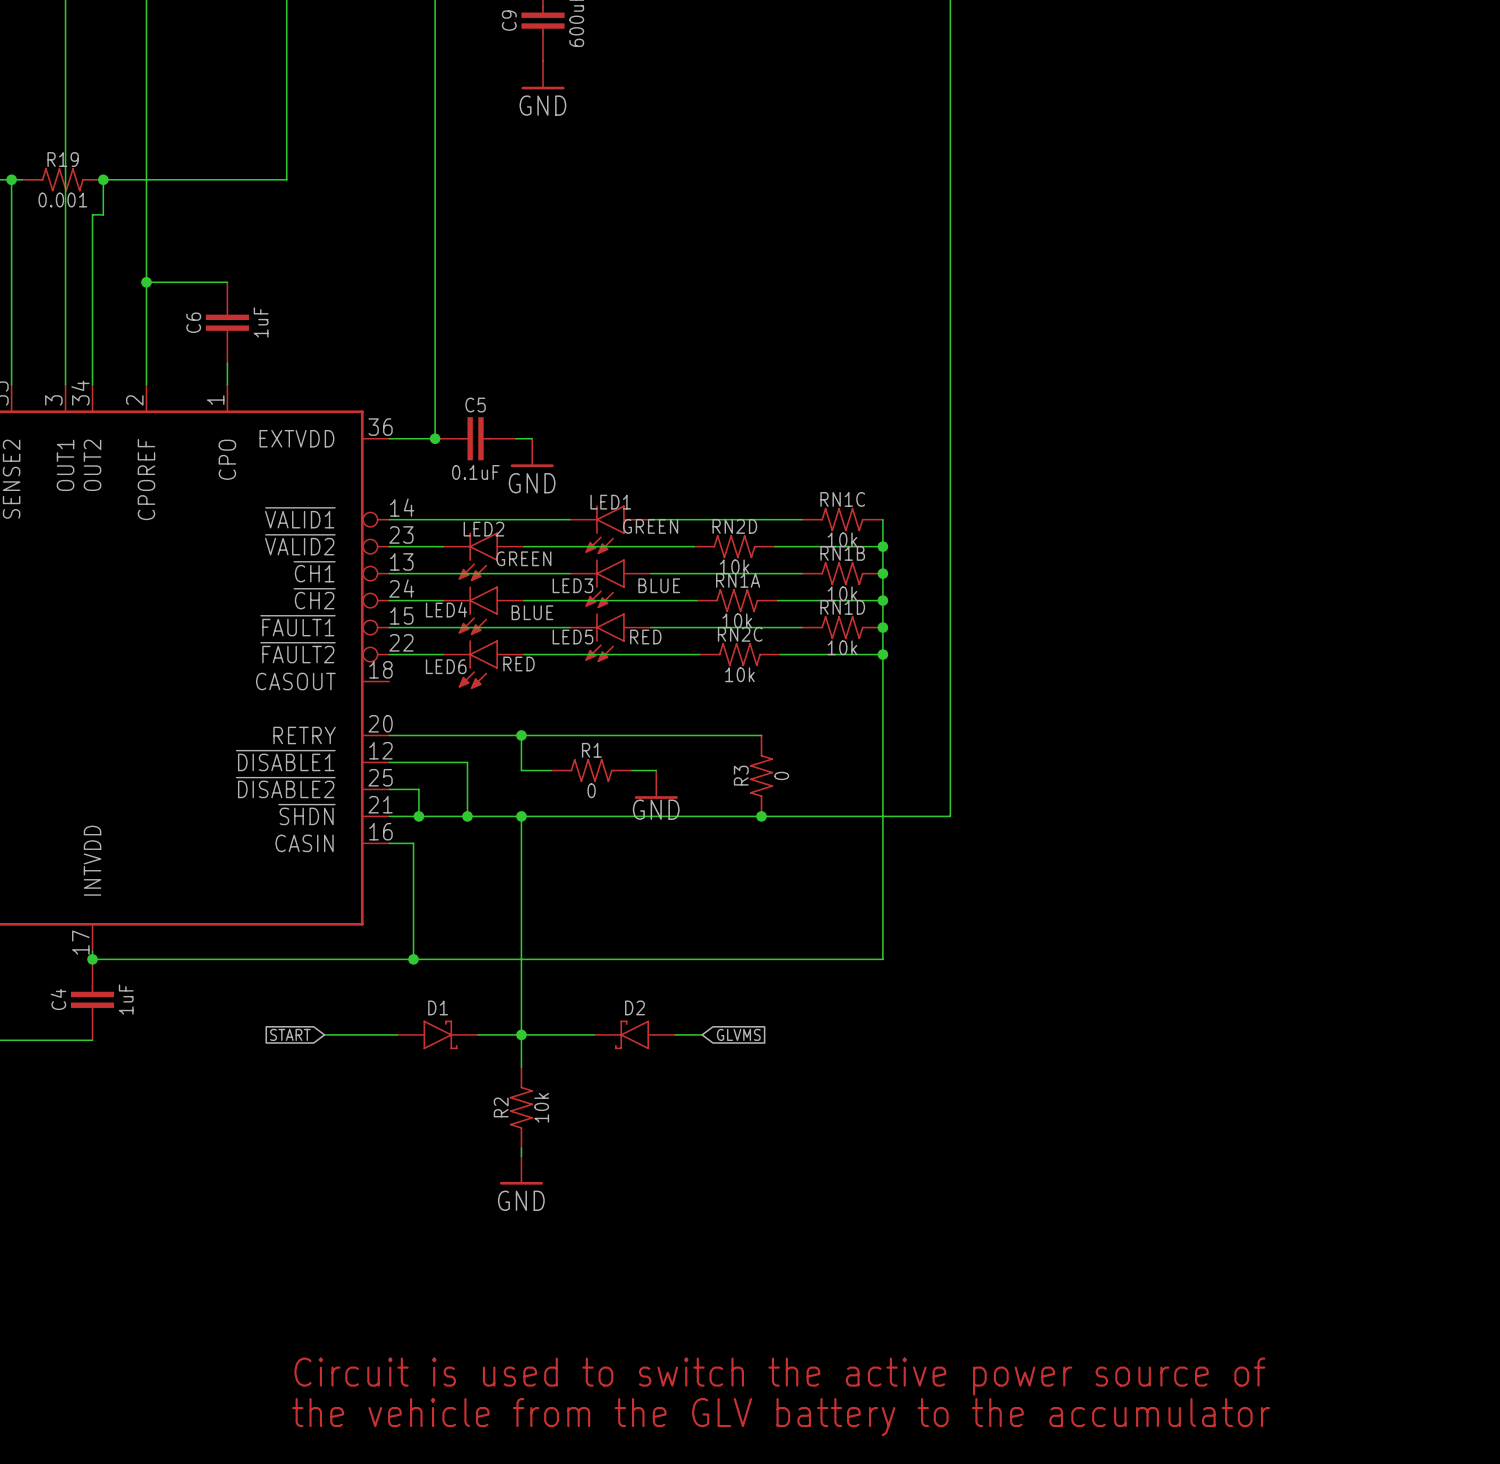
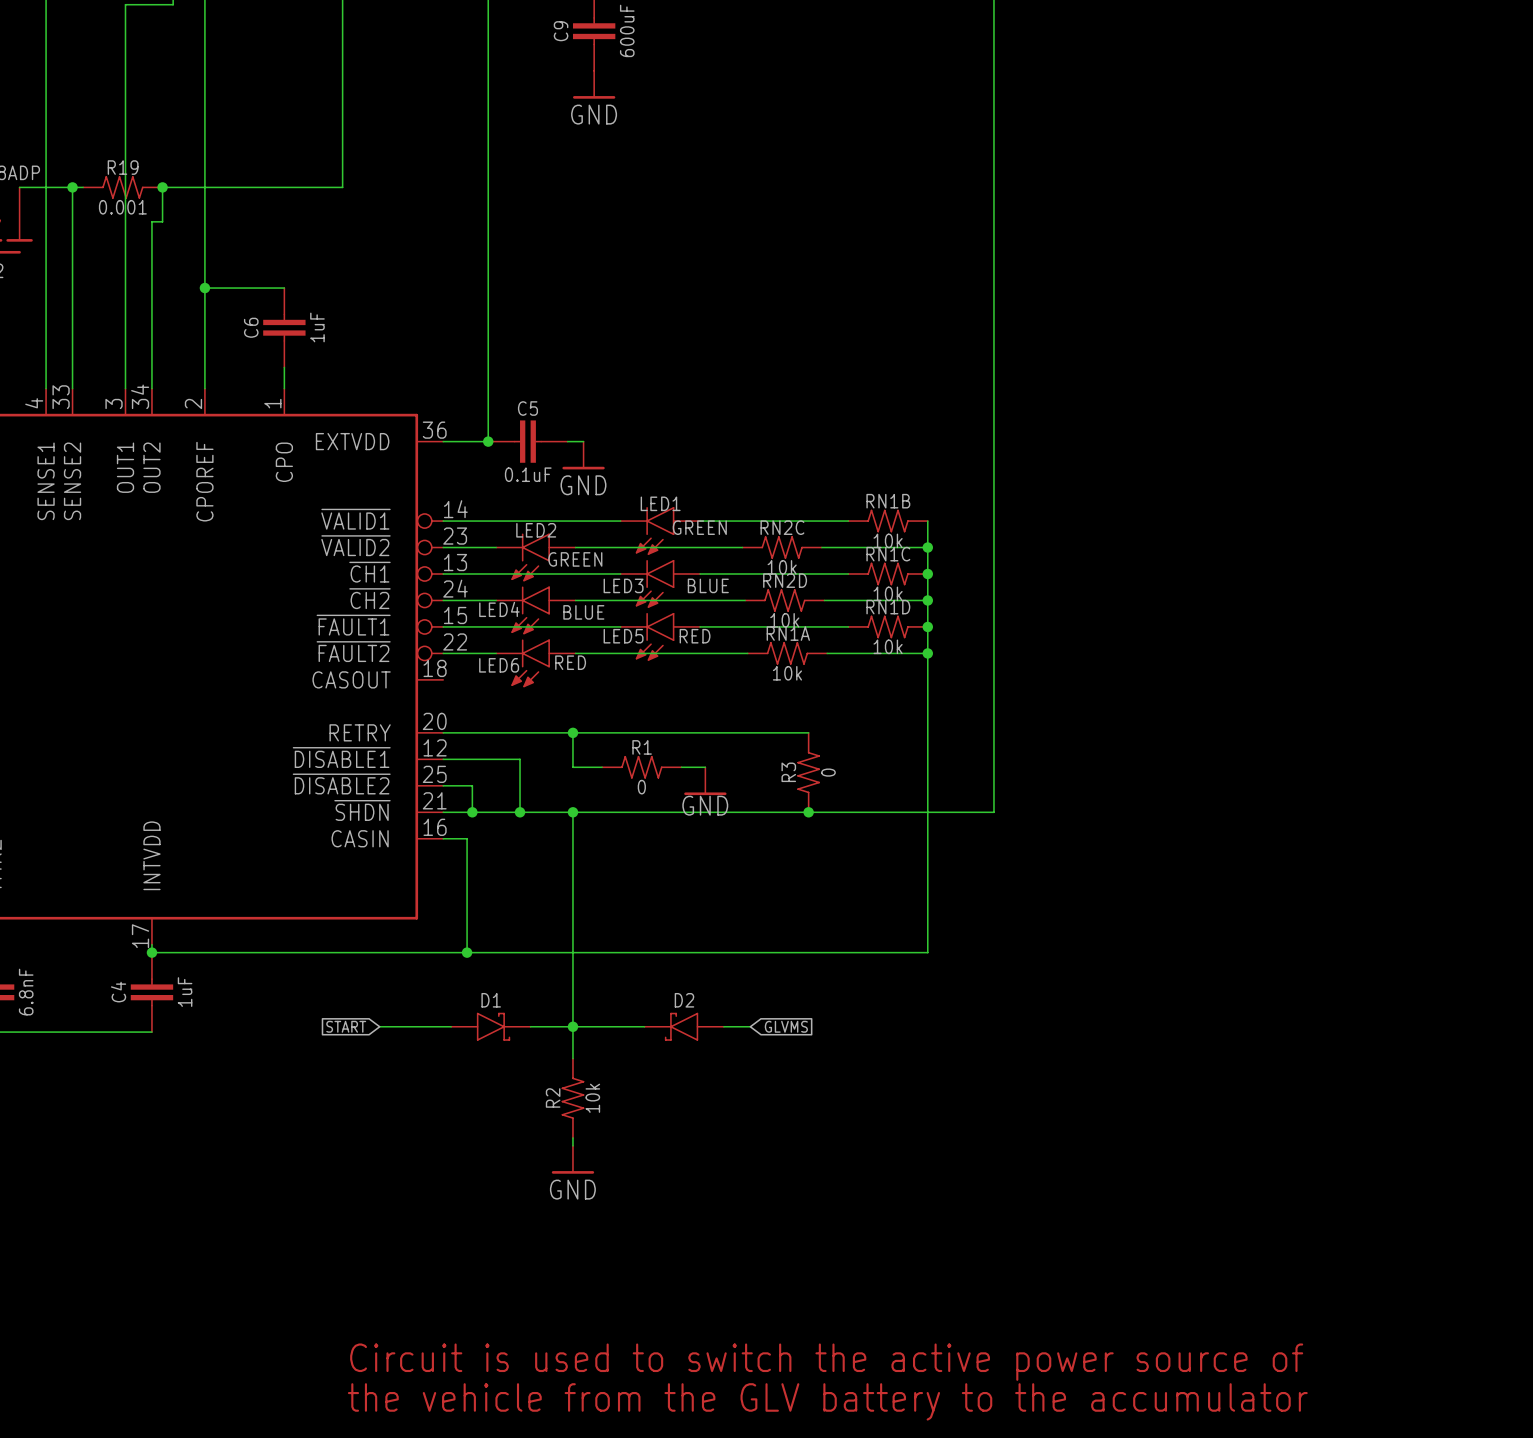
RN1C name: RN1C (842, 499) -> RN1B (888, 501)
RN2D name: RN2D (734, 526) -> RN2C (782, 527)
RN1B name: RN1B (842, 553) -> RN1C (888, 554)
RN1A name: RN1A (738, 580) -> RN2D (785, 580)
RN2C name: RN2C (740, 634) -> RN1A (788, 633)

